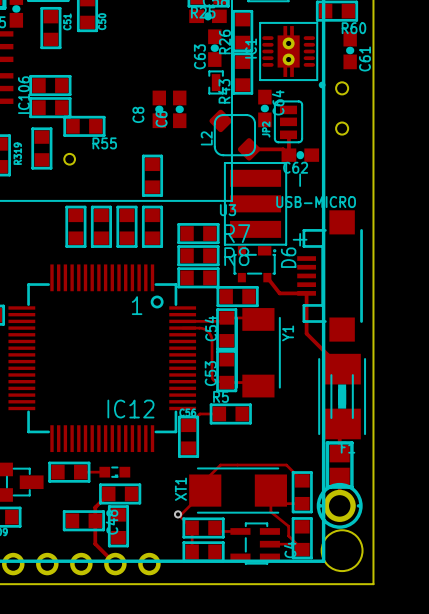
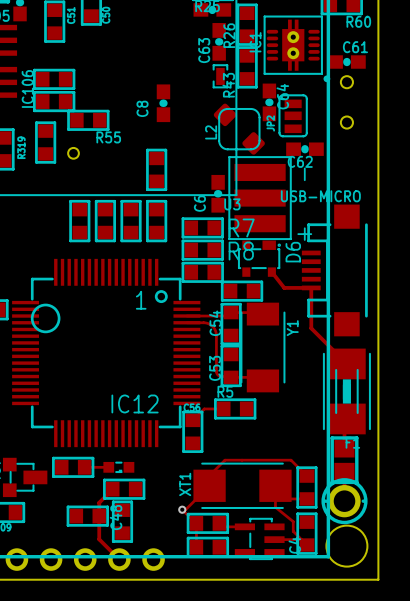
C61 rotation: 0° (350, 50) -> 90° clockwise (346, 62)
C6 position: (179, 109) -> (218, 193)
track: (288, 134) (288, 155) (283, 149) (249, 149) -> none
drawing: none -> [30, 303, 61, 334]

